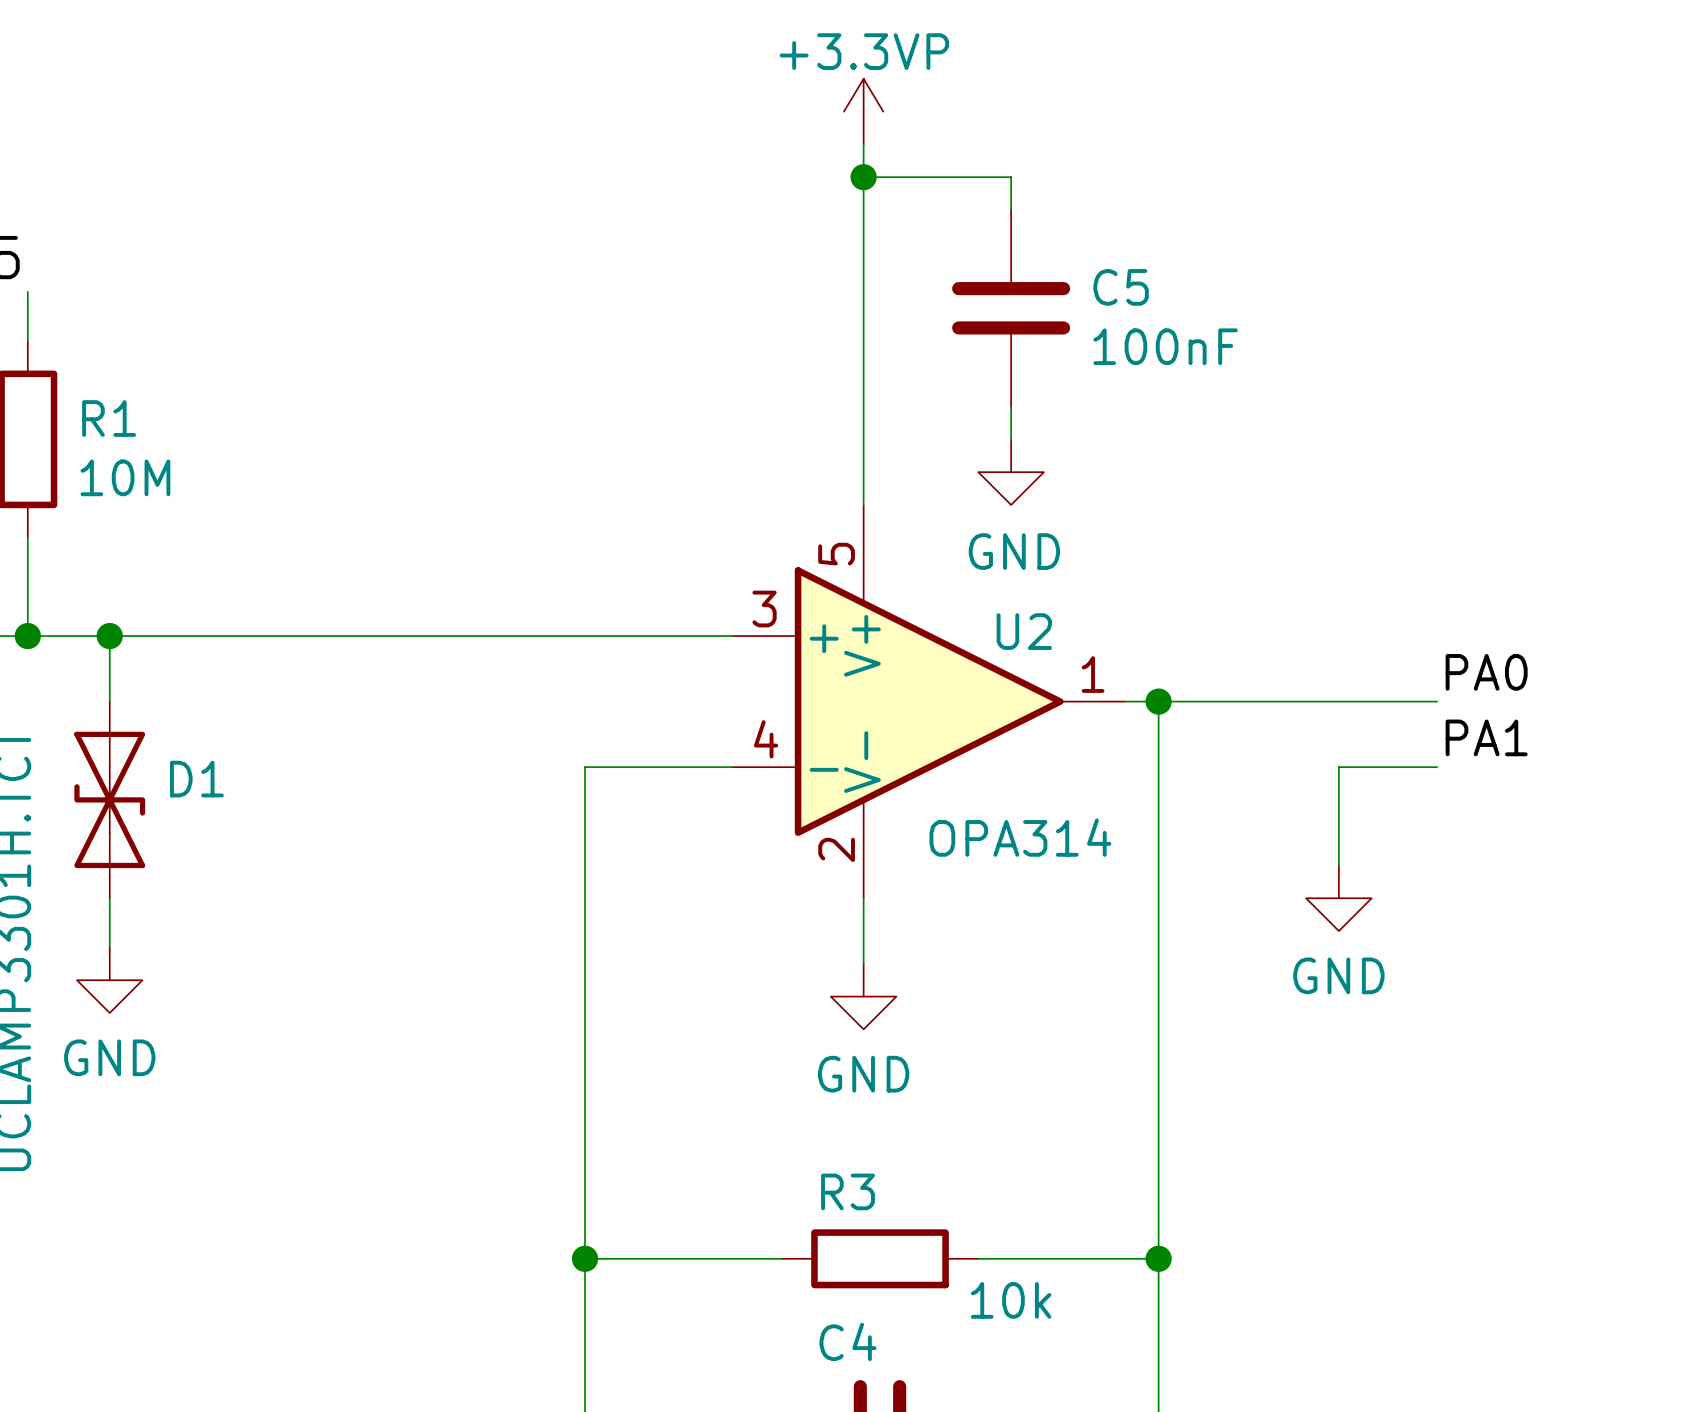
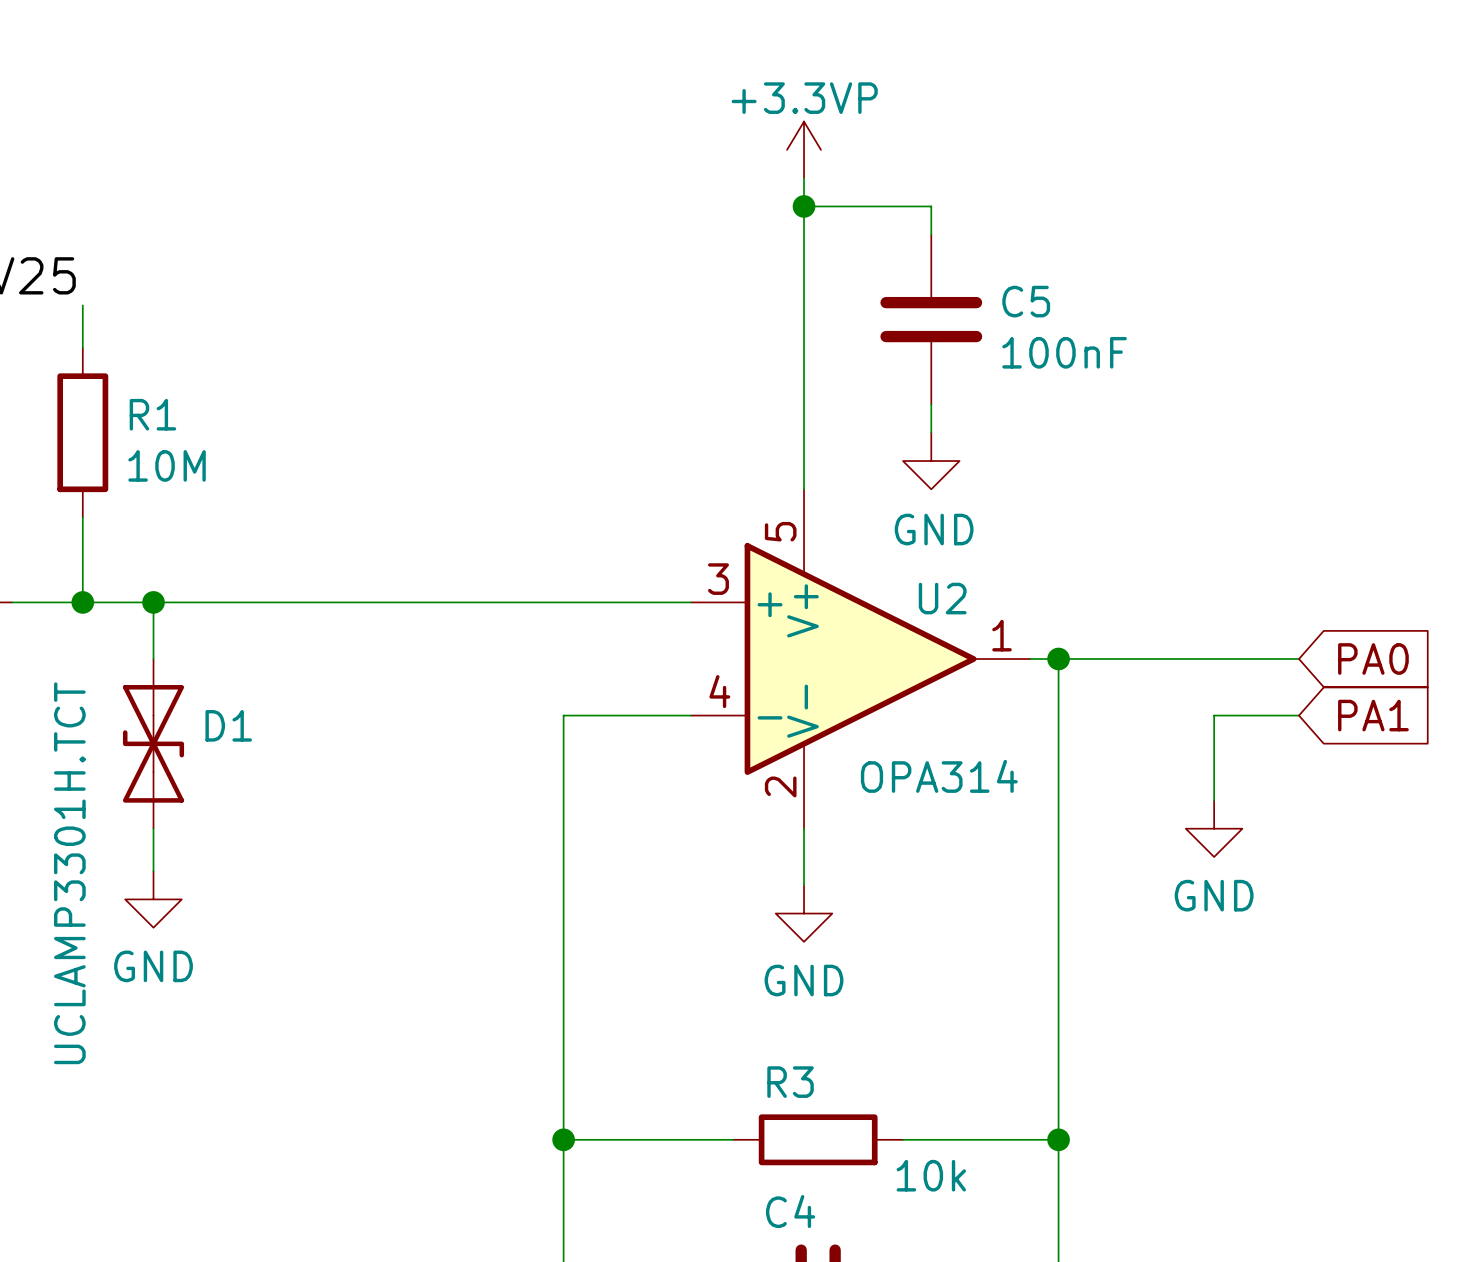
label: PA0 (1486, 672) -> none
global label: none -> PA0 (1373, 658)
label: PA1 (1486, 737) -> none
global label: none -> PA1 (1373, 715)

